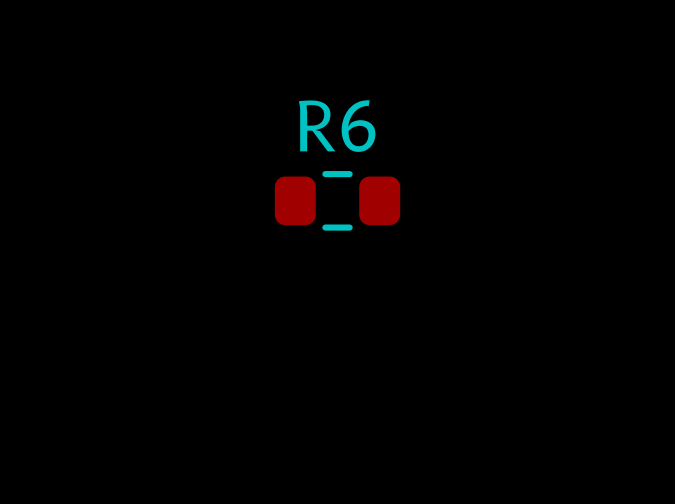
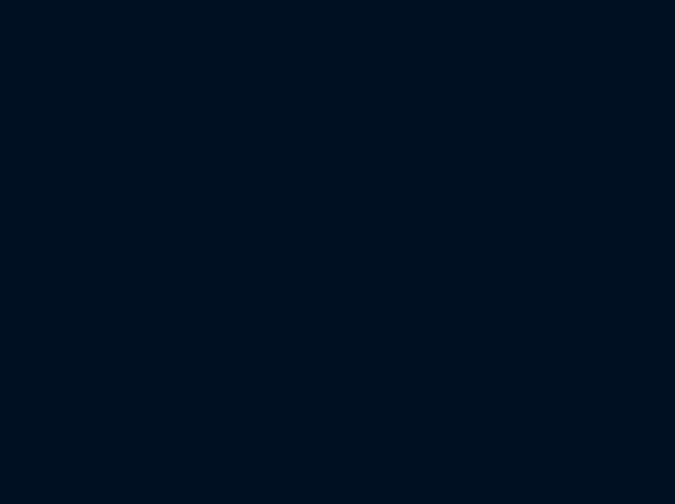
R6: (337, 200) -> none

